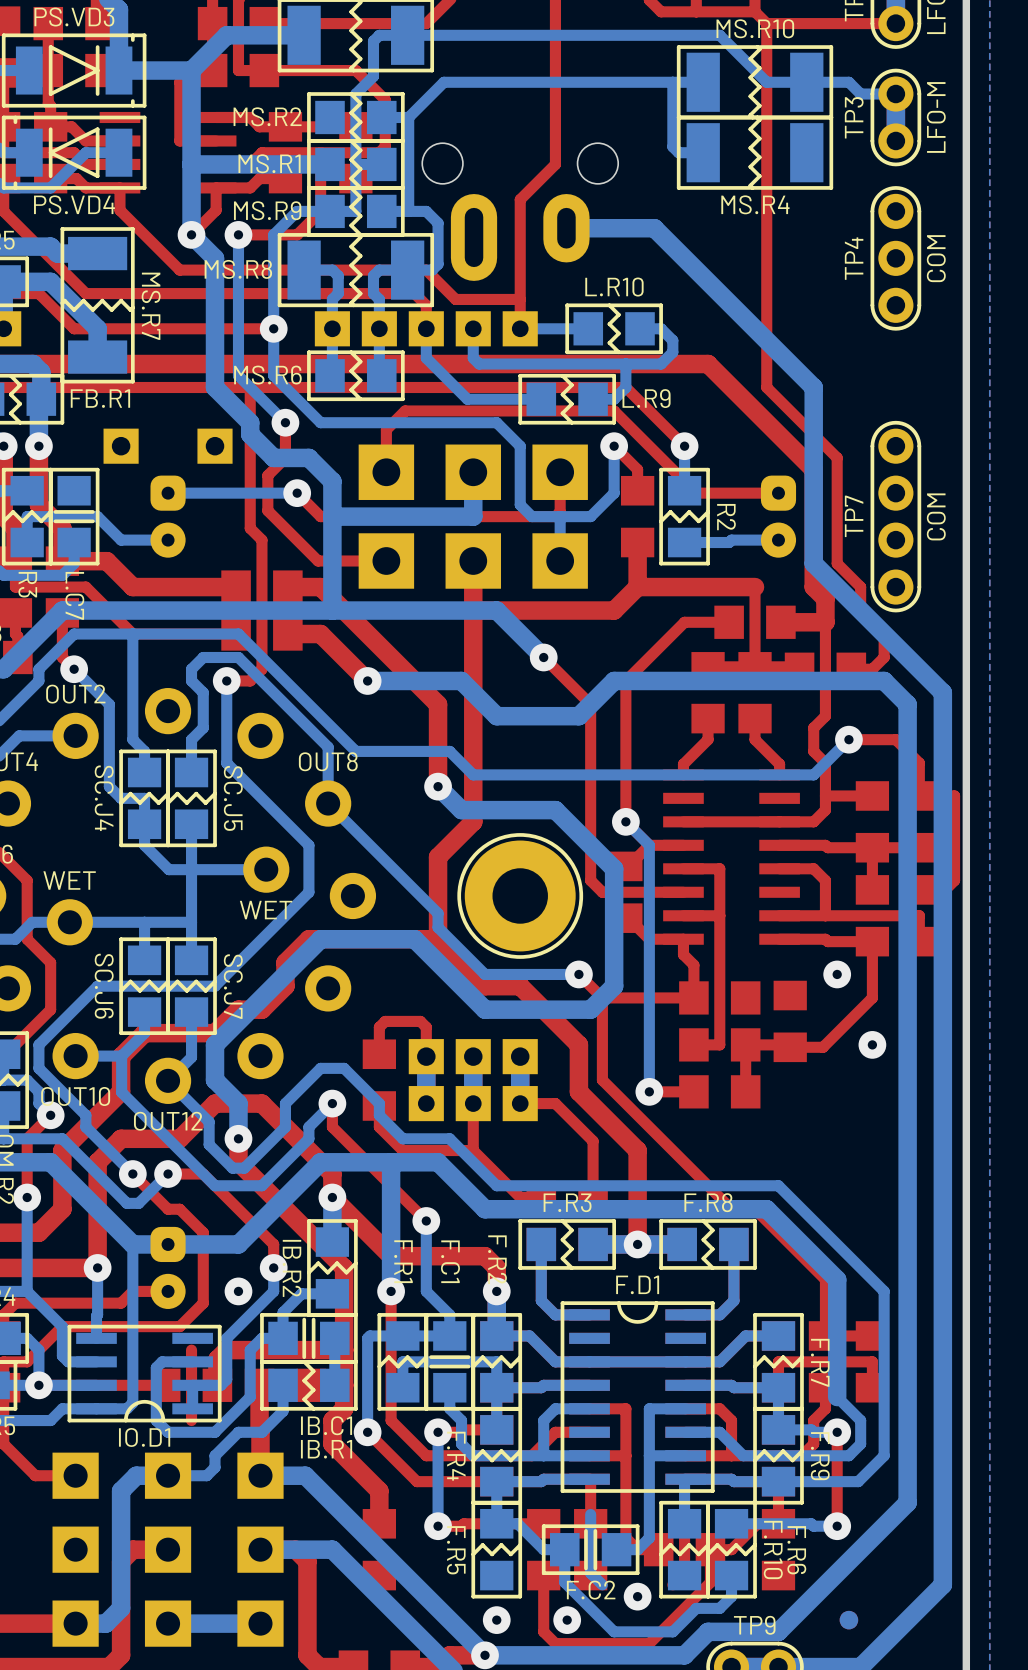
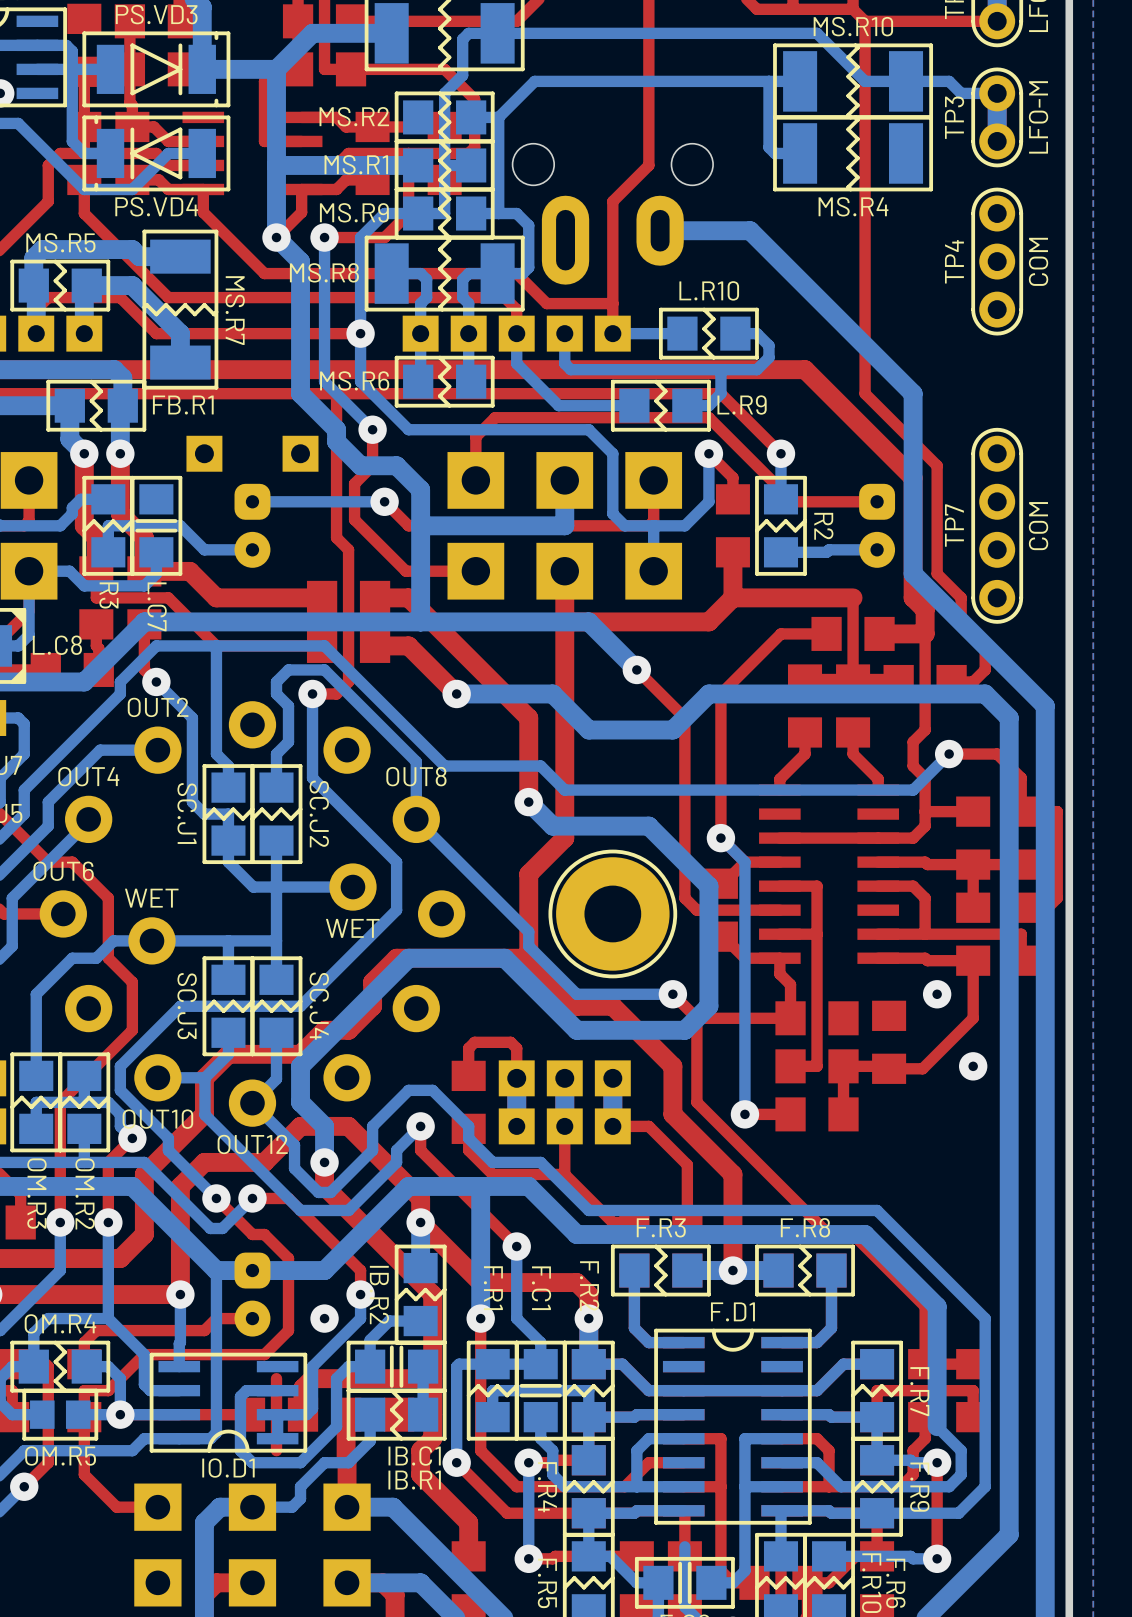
SC.J4 name: SC.J4 (104, 798) -> SC.J1 (187, 813)
SC.J5 name: SC.J5 (233, 798) -> SC.J2 (319, 814)
SC.J6 name: SC.J6 (104, 986) -> SC.J3 (187, 1006)
SC.J7 name: SC.J7 (233, 986) -> SC.J4 (319, 1006)

